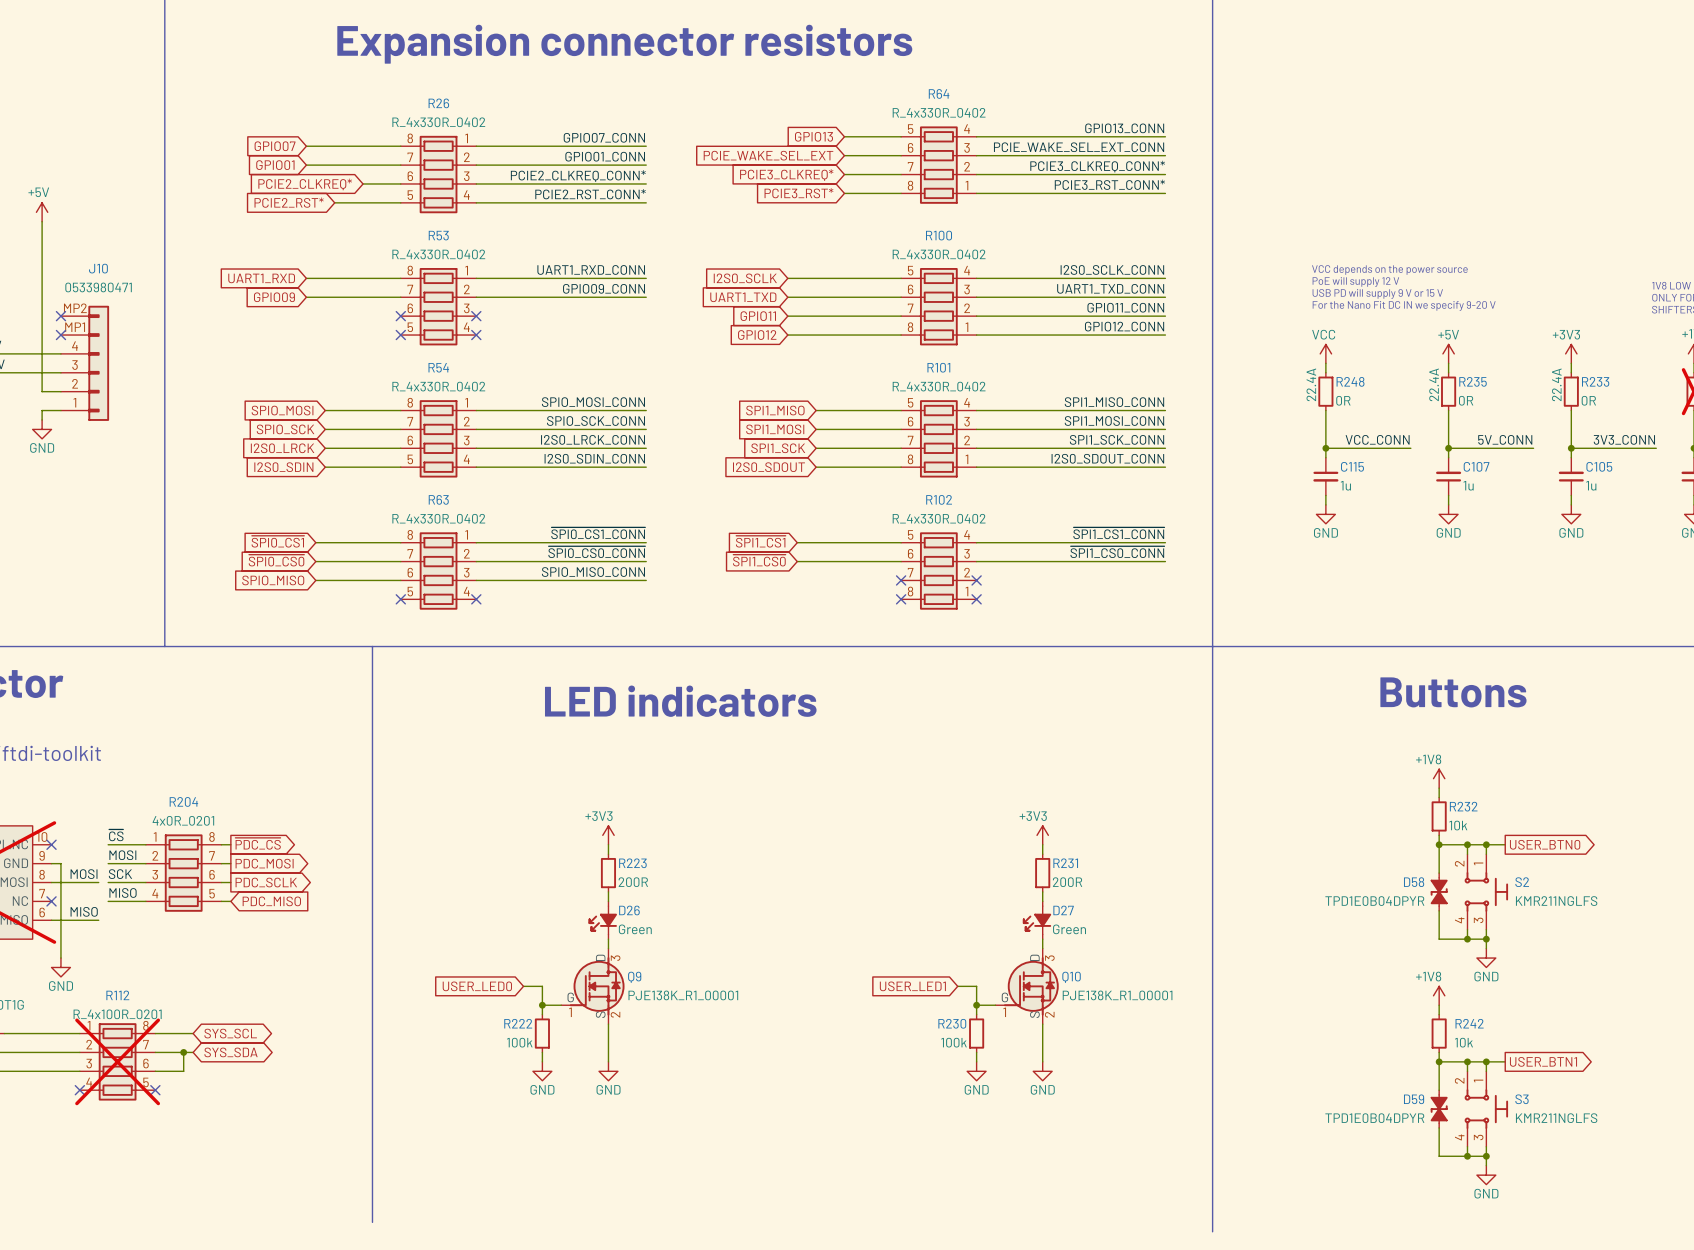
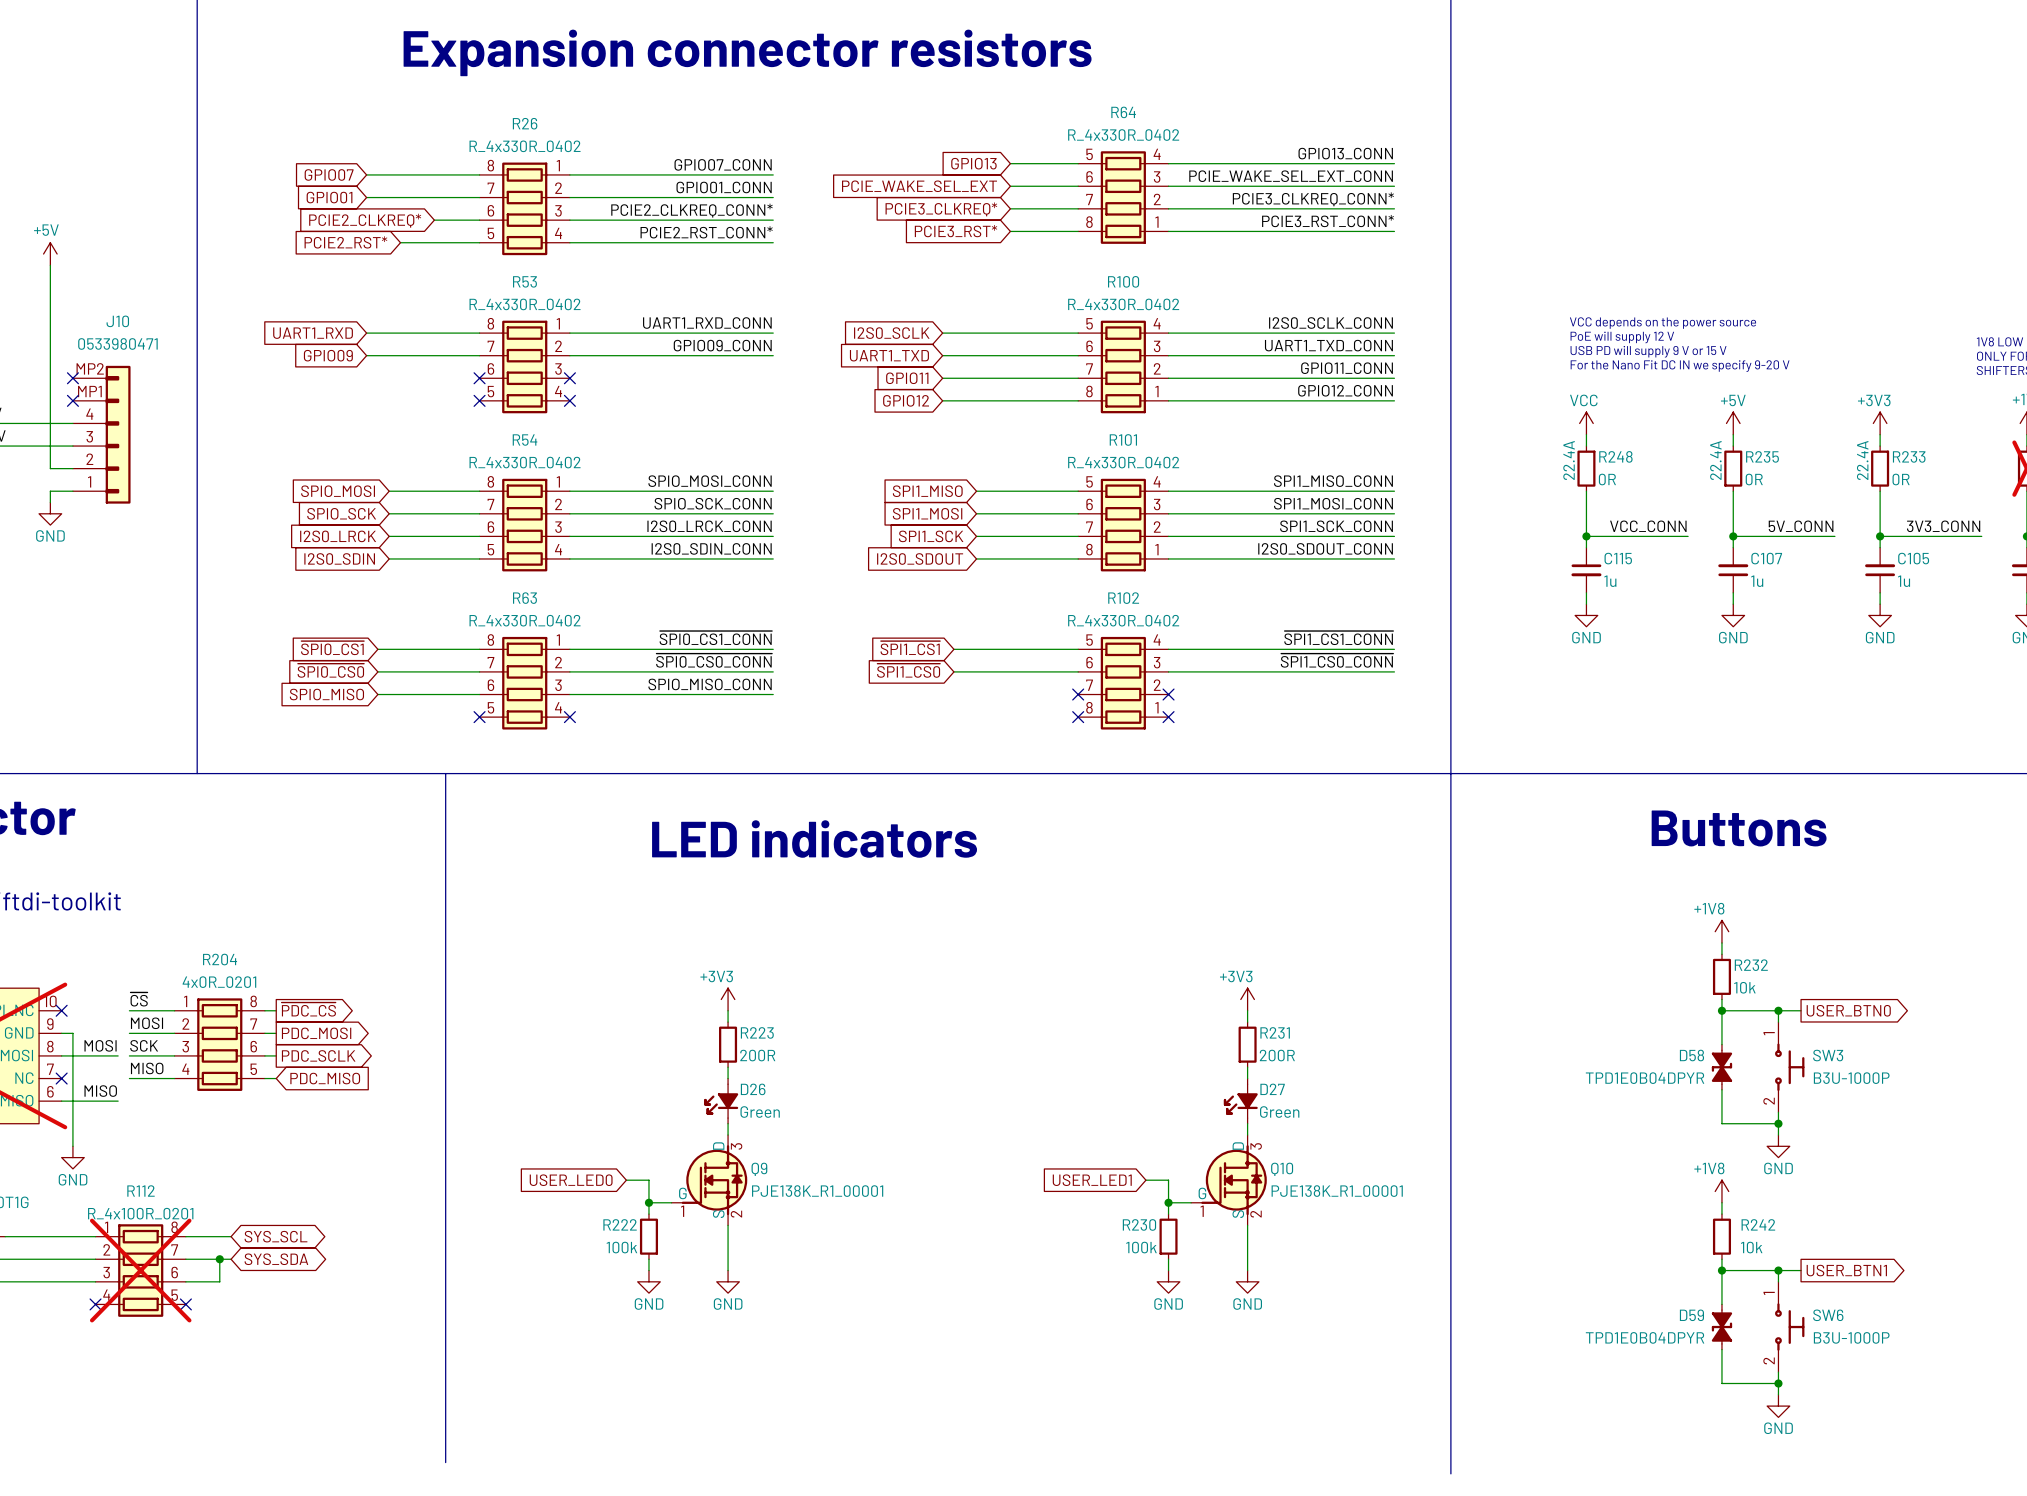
wire: (1467, 844) (1467, 854) -> none
junction: (1467, 844) -> none
S2: (1486, 891) -> none
SW3: none -> (1789, 1067)
wire: (1467, 929) (1467, 939) -> none
junction: (1467, 939) -> none
wire: (1467, 1061) (1467, 1071) -> none
junction: (1467, 1061) -> none
S3: (1486, 1109) -> none
SW6: none -> (1789, 1327)
wire: (1467, 1146) (1467, 1156) -> none
junction: (1467, 1156) -> none

